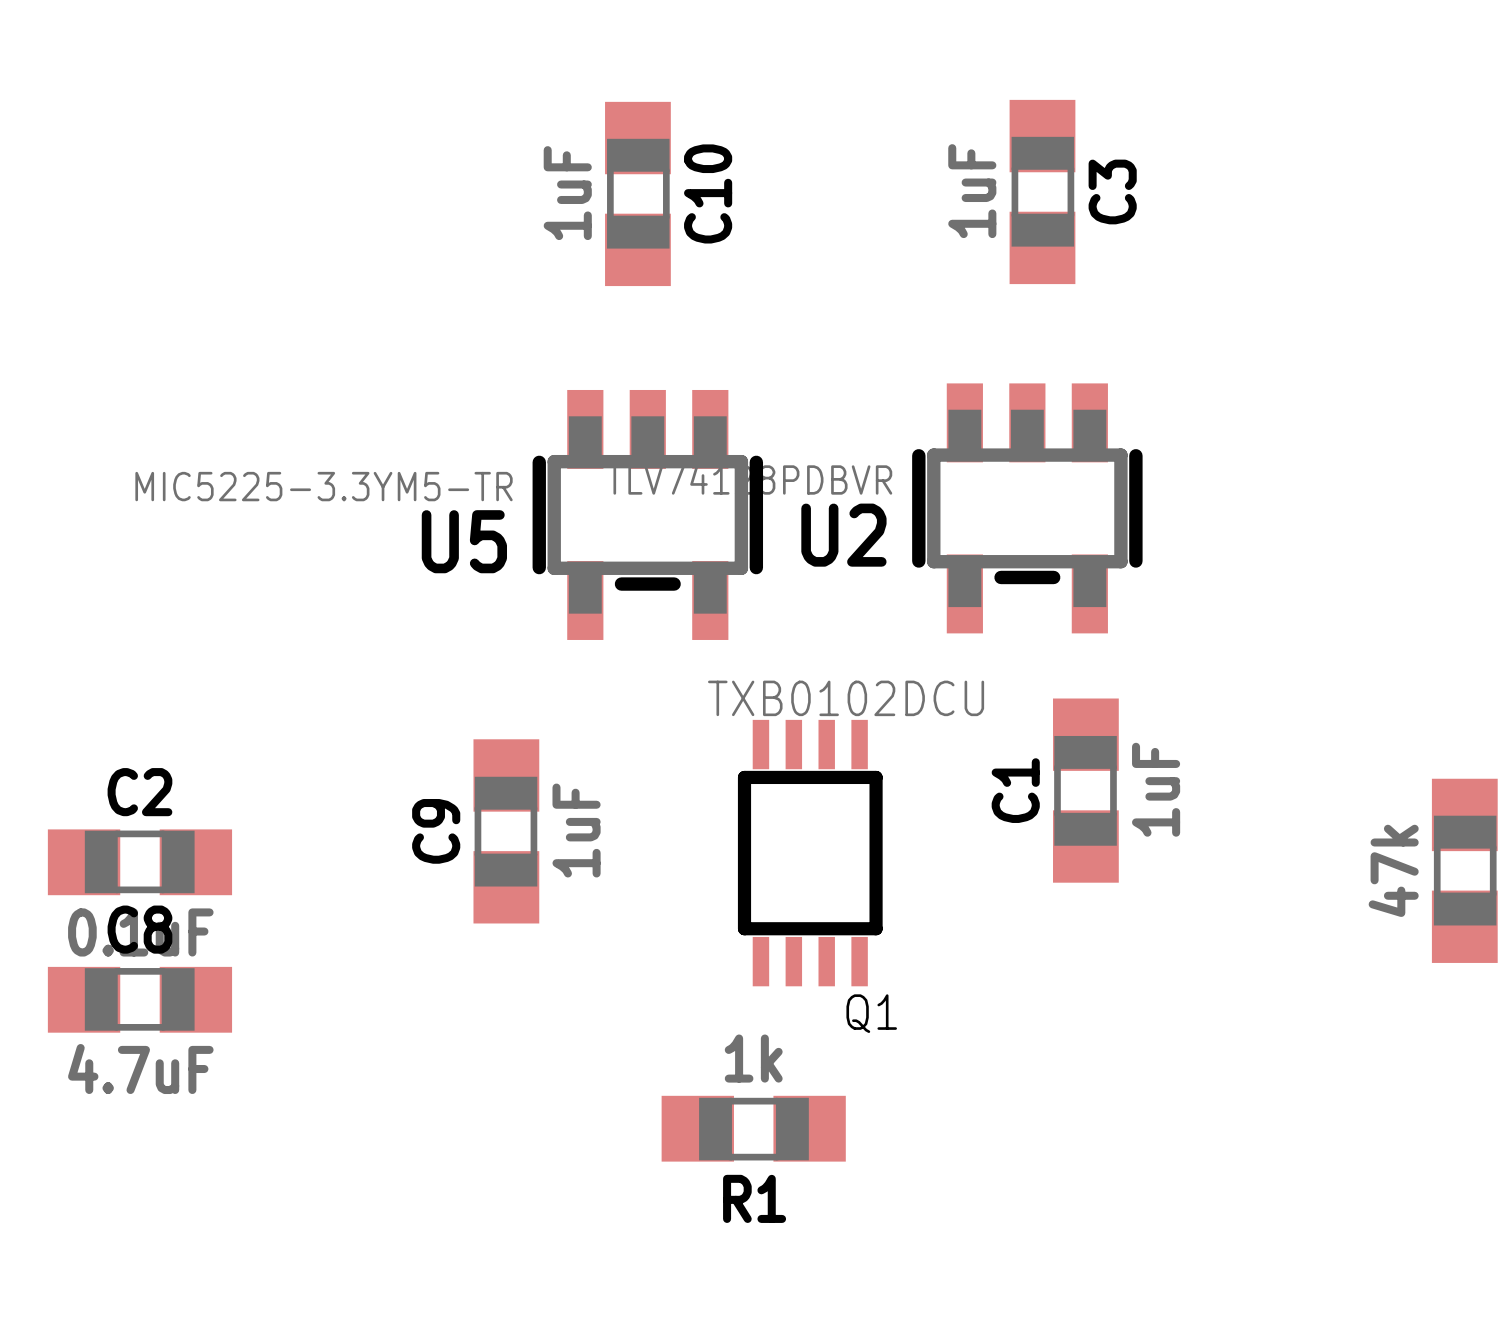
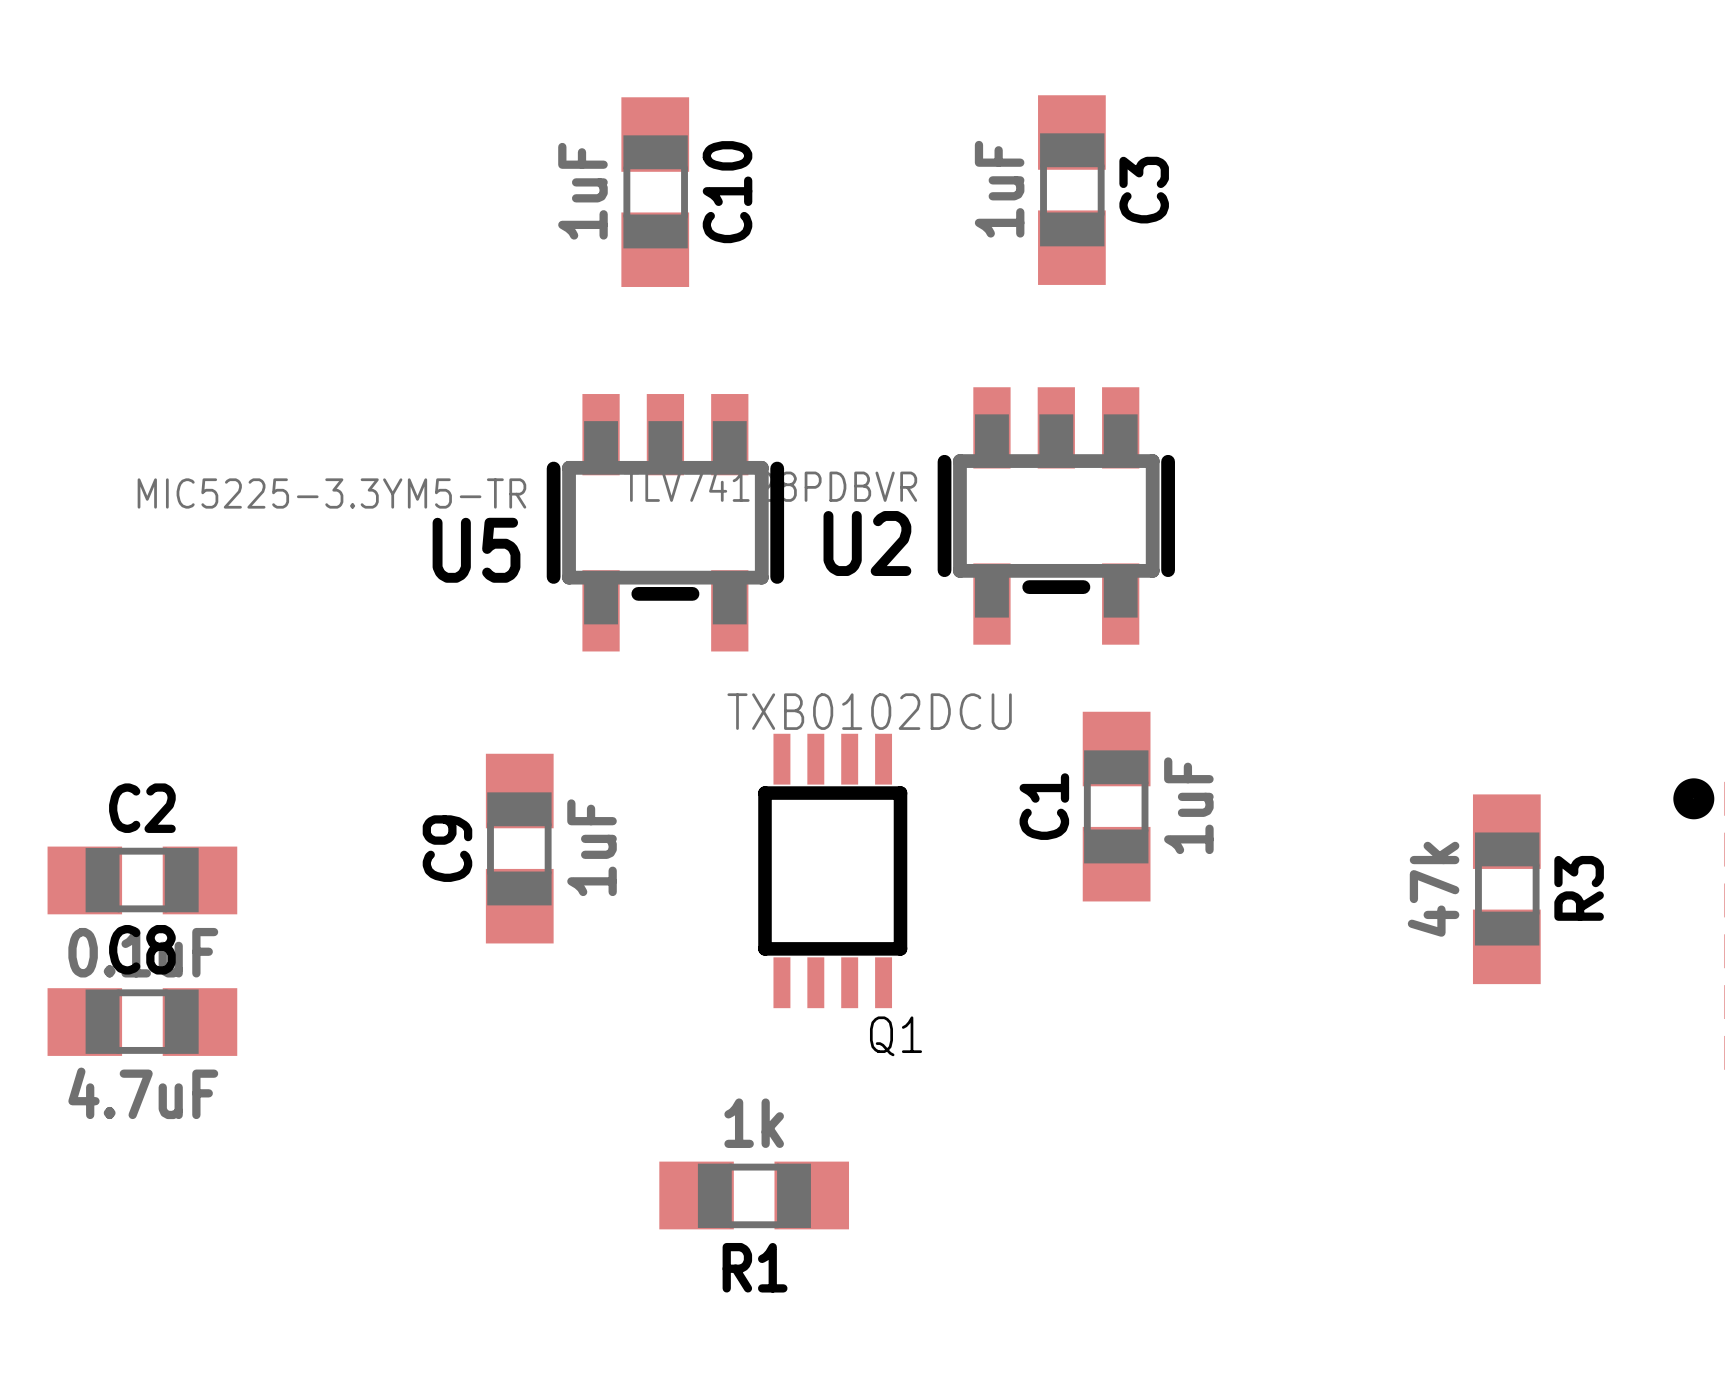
R1 position: (753, 1128) -> (754, 1195)

